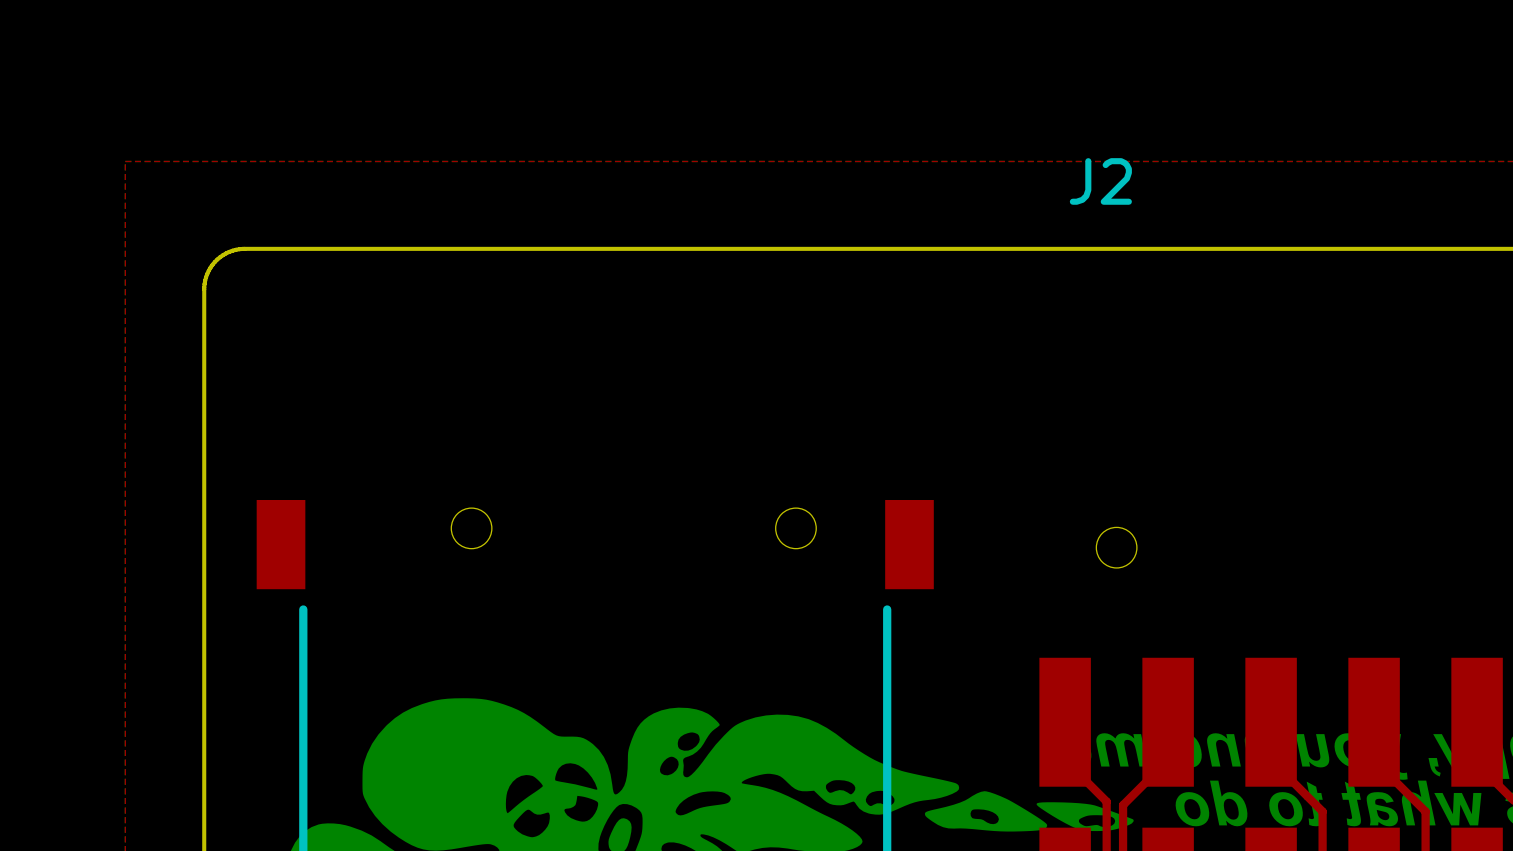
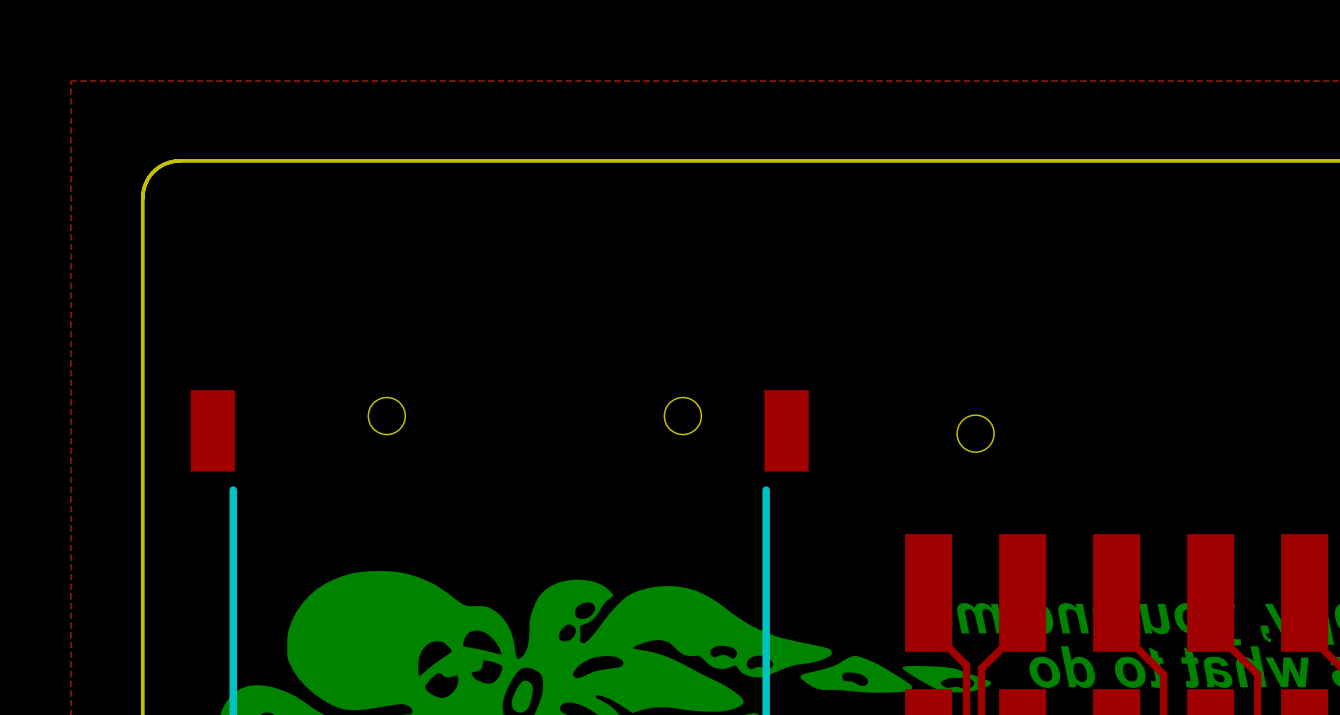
J2 name: J2 (1100, 181) -> none

